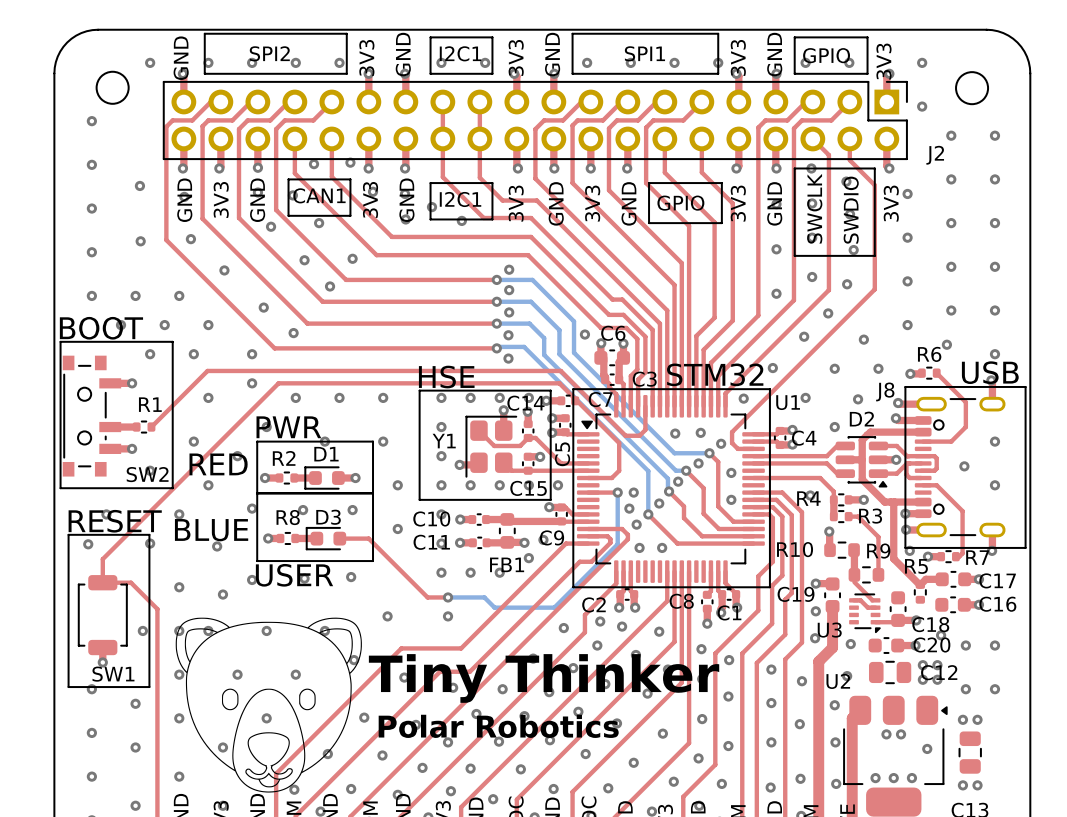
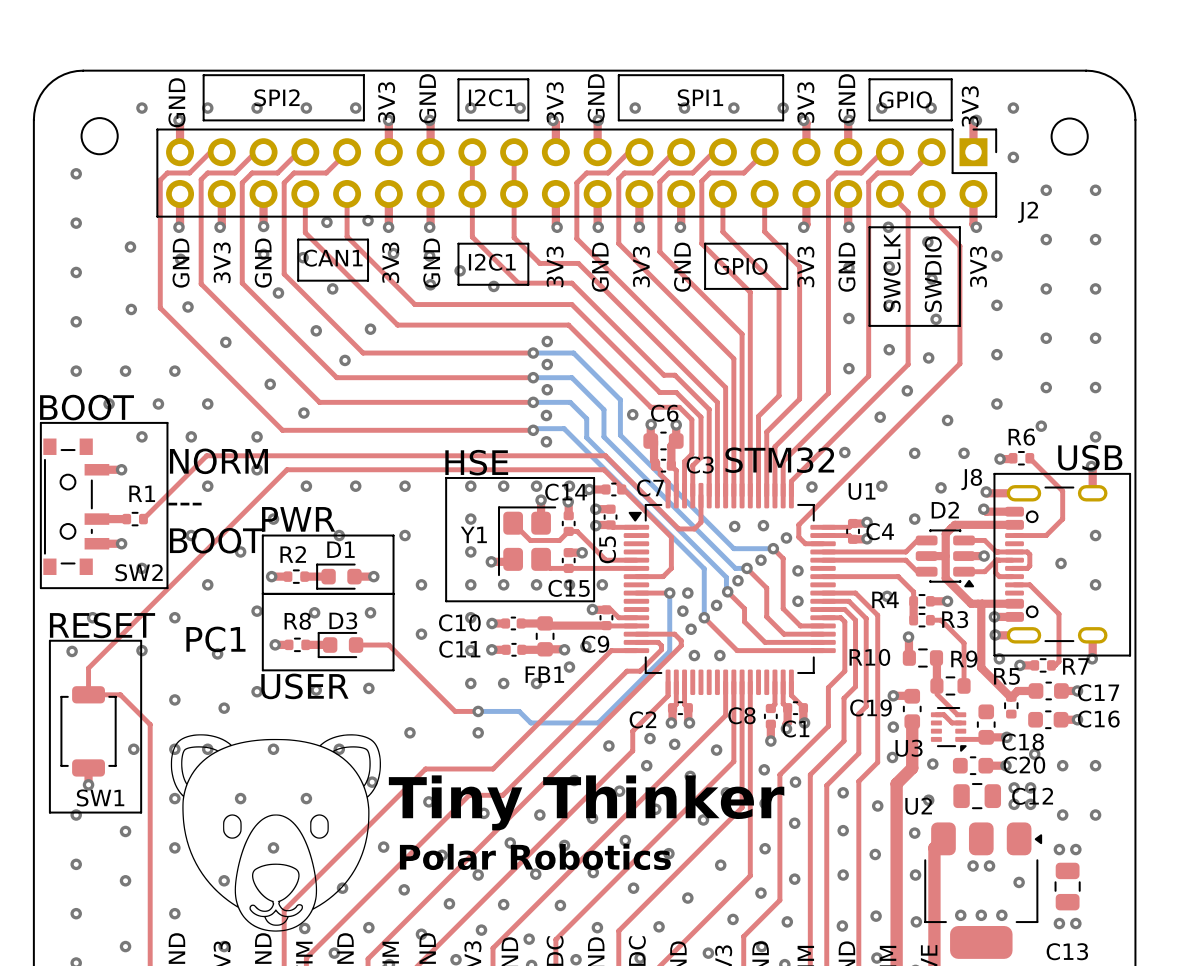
text: none -> NORM (218, 461)
line: (573, 389) (769, 389) (769, 587) (573, 587) (573, 389) -> none
text: none -> --- (184, 504)
text: none -> BOOT (216, 540)
text: RED (218, 464) -> none
text: BLUE (211, 530) -> none
text: none -> PC1 (215, 639)

